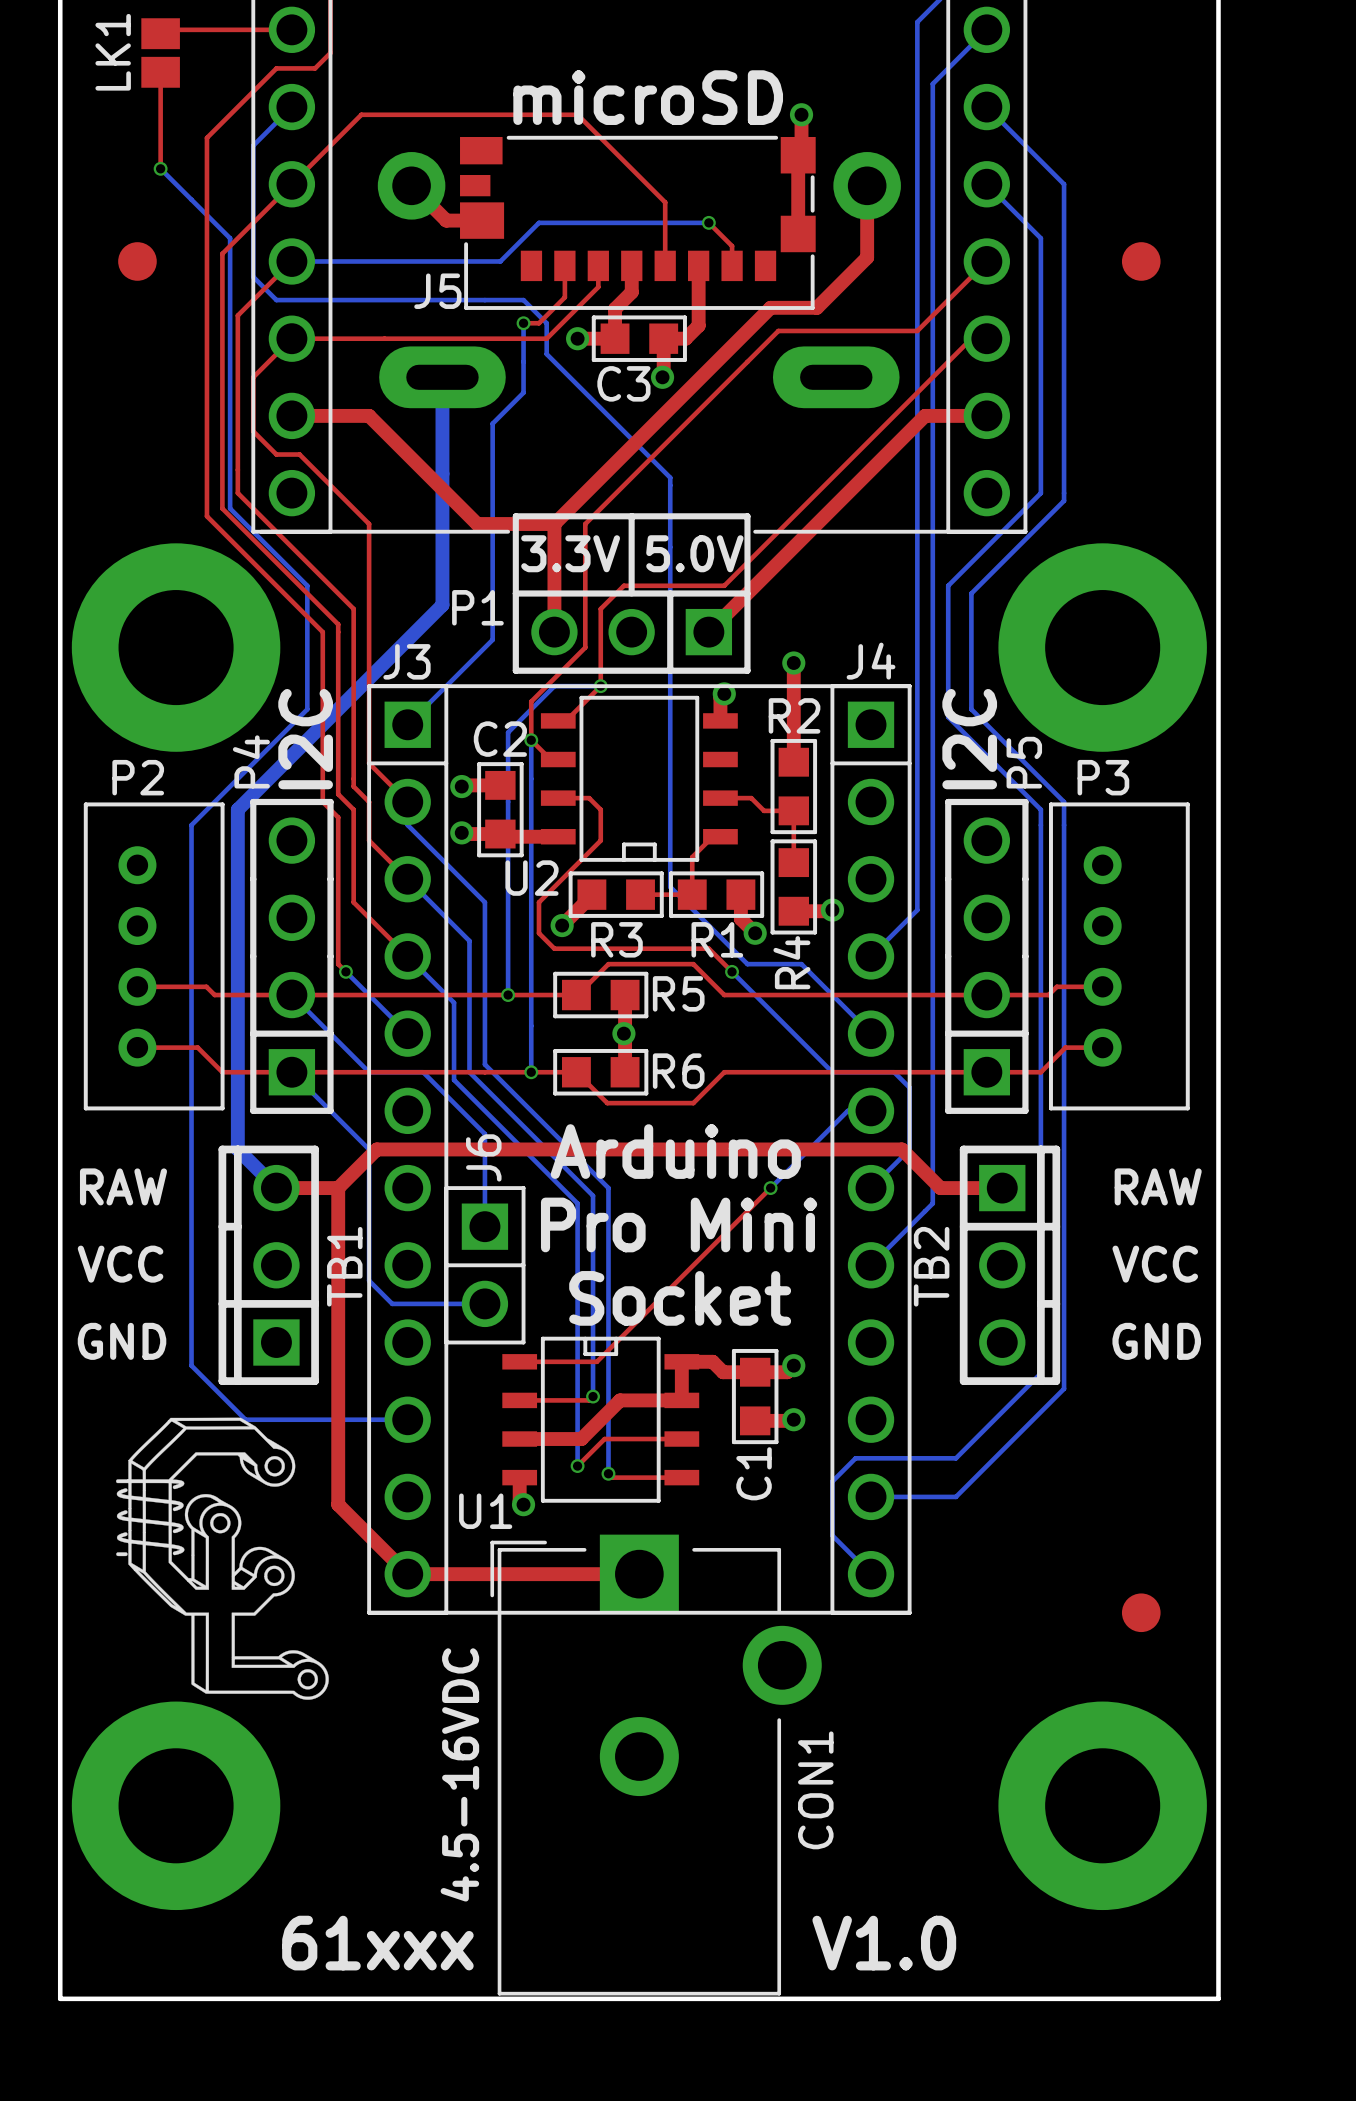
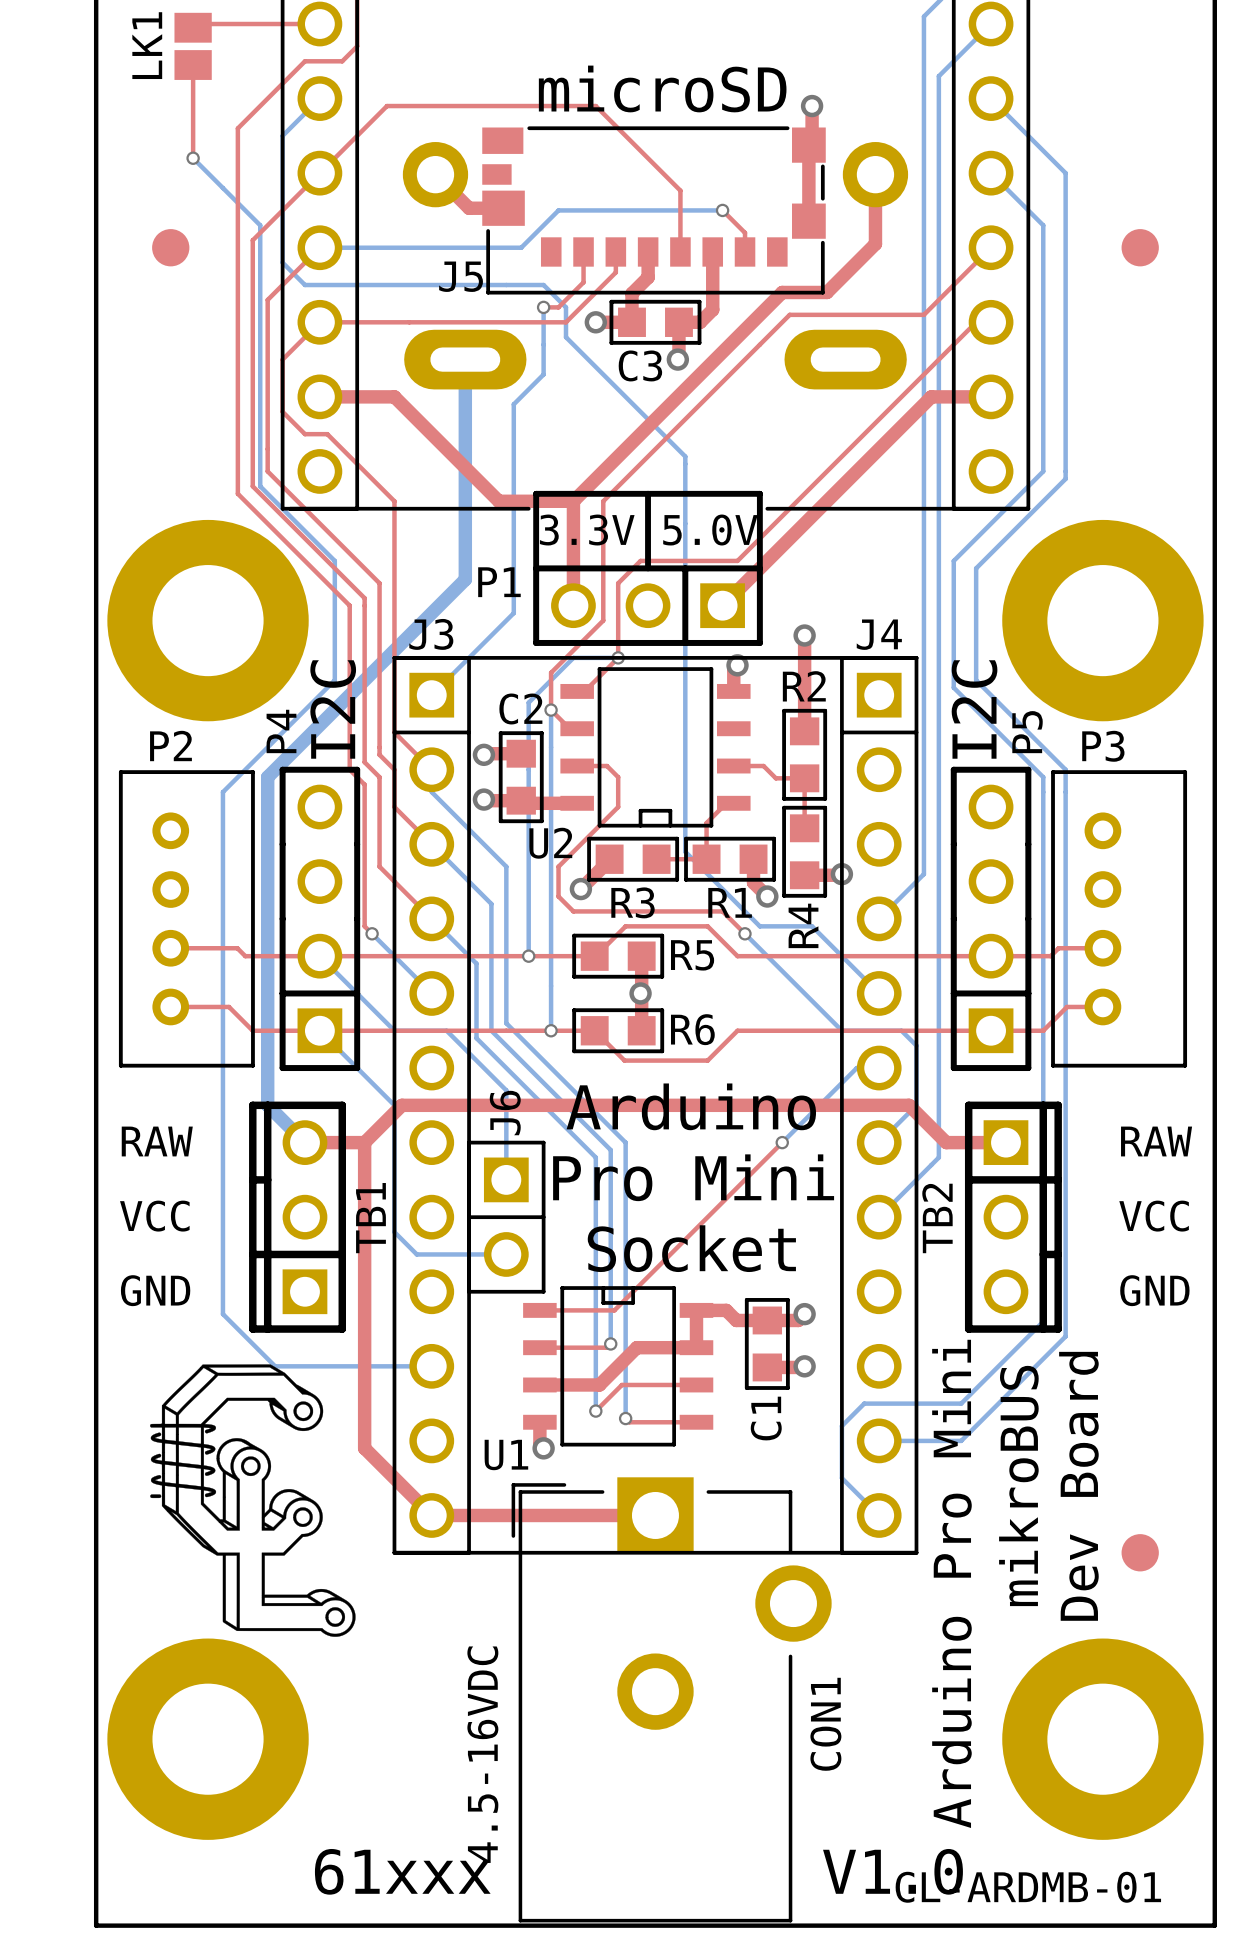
text: none -> mikroBUS (1018, 1485)
text: none -> Dev Board (1078, 1486)
text: none -> Arduino Pro Mini (951, 1583)
text position: 4.5-16VDC (459, 1774) -> 4.5-16VDC (482, 1754)
text: none -> CL-ARDMB-01 (1028, 1887)

